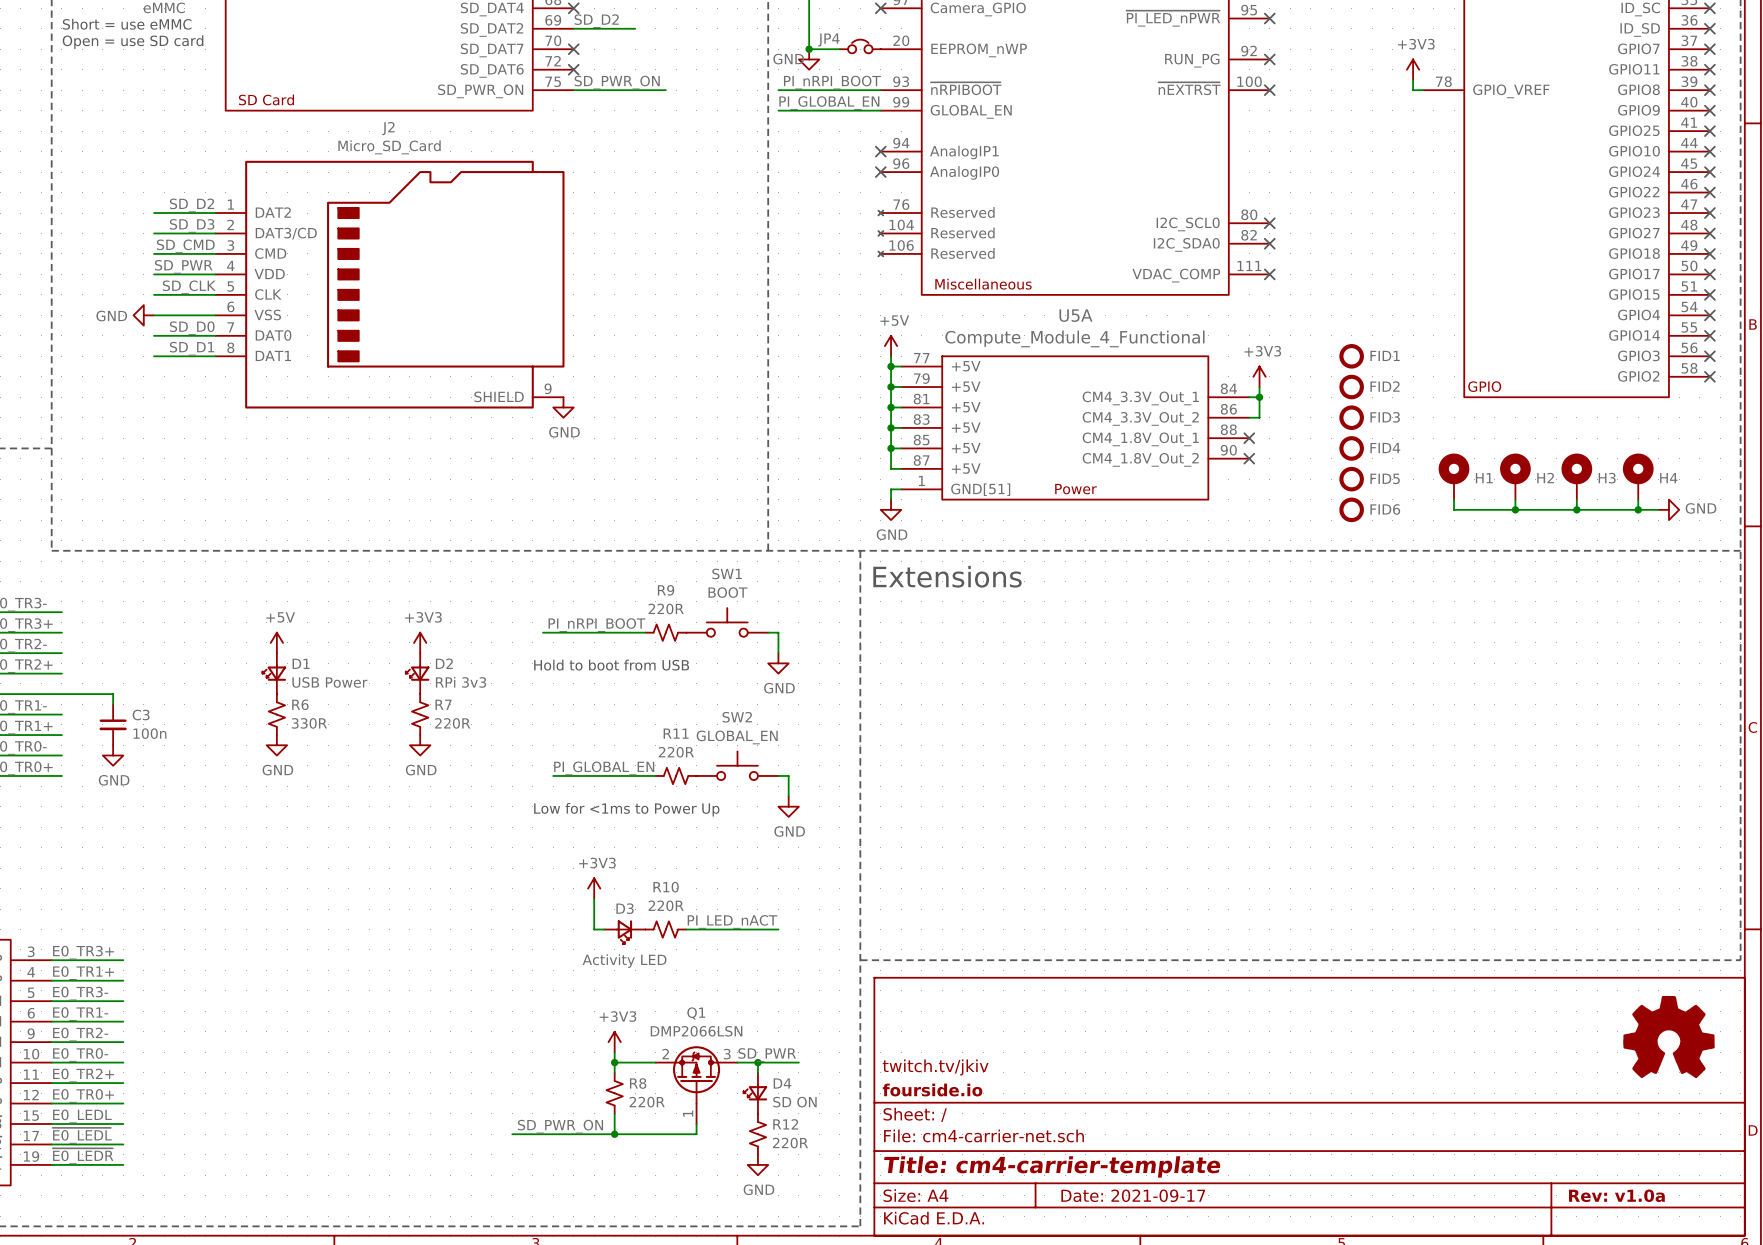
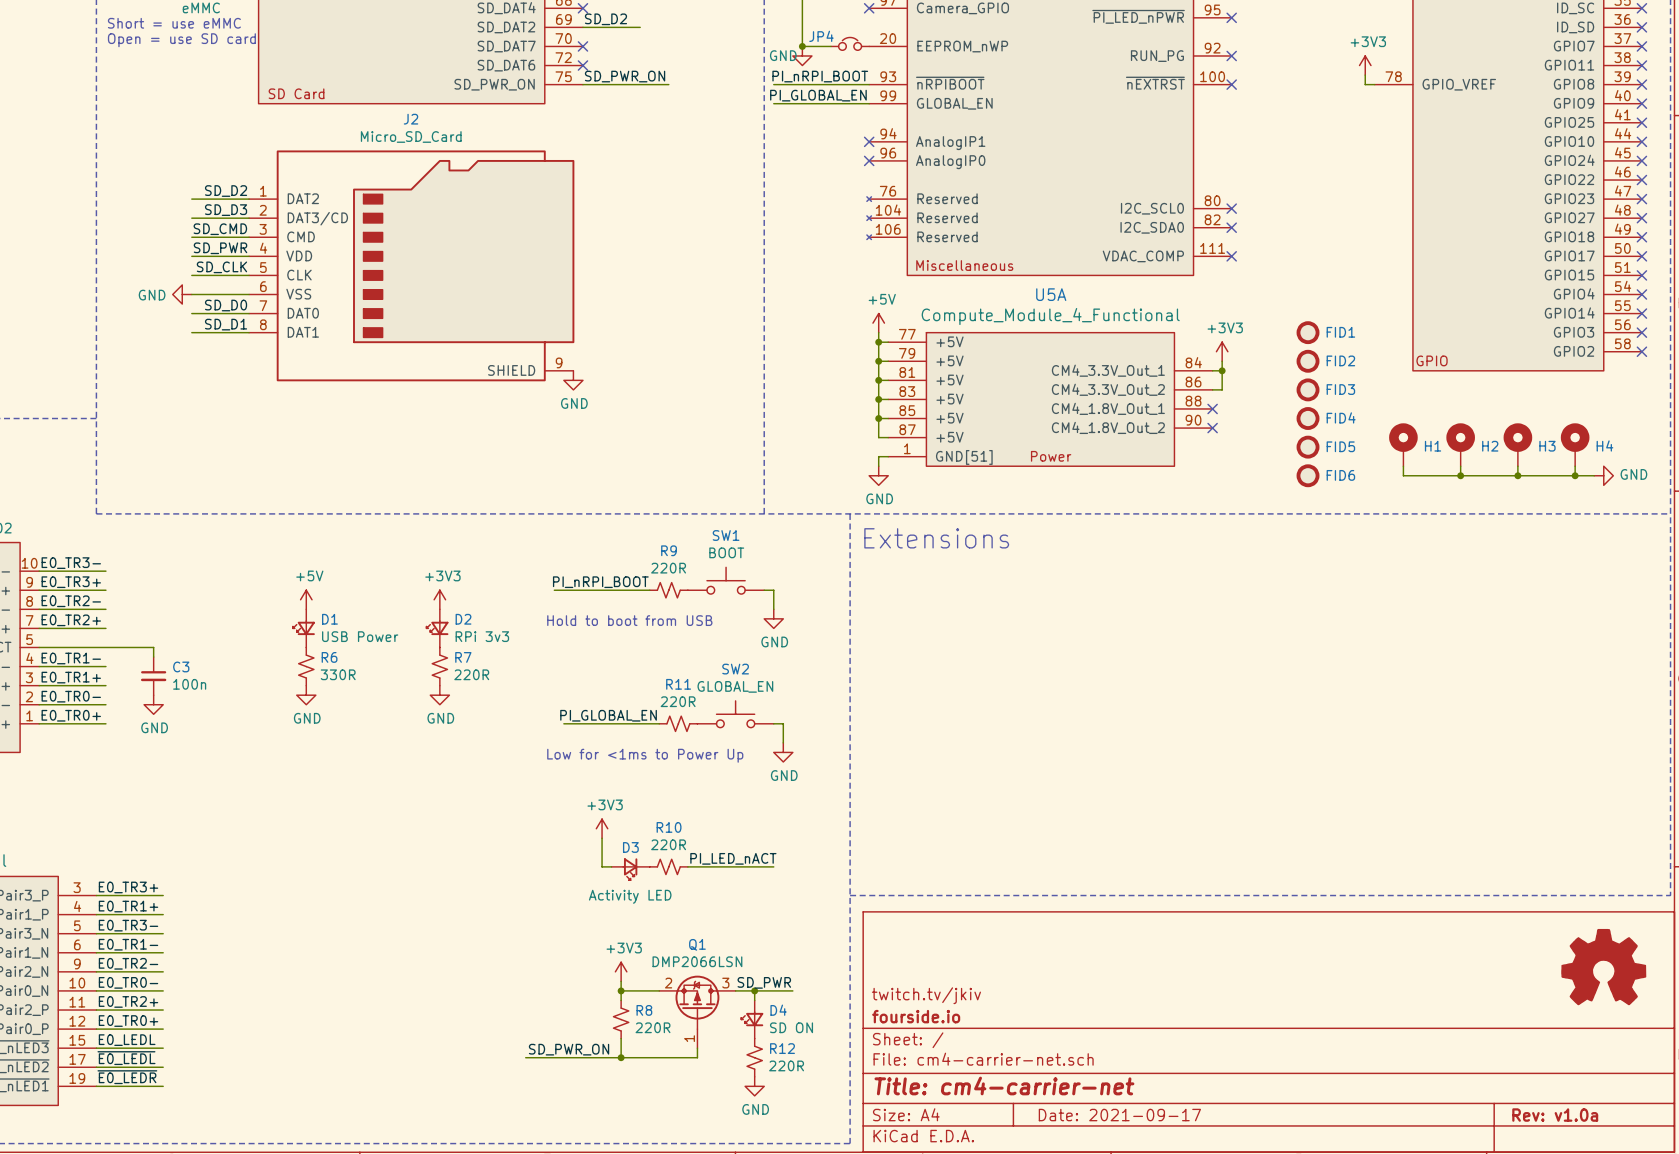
title block: Title: cm4-carrier-template (1052, 1166) -> Title: cm4-carrier-net (1004, 1085)

